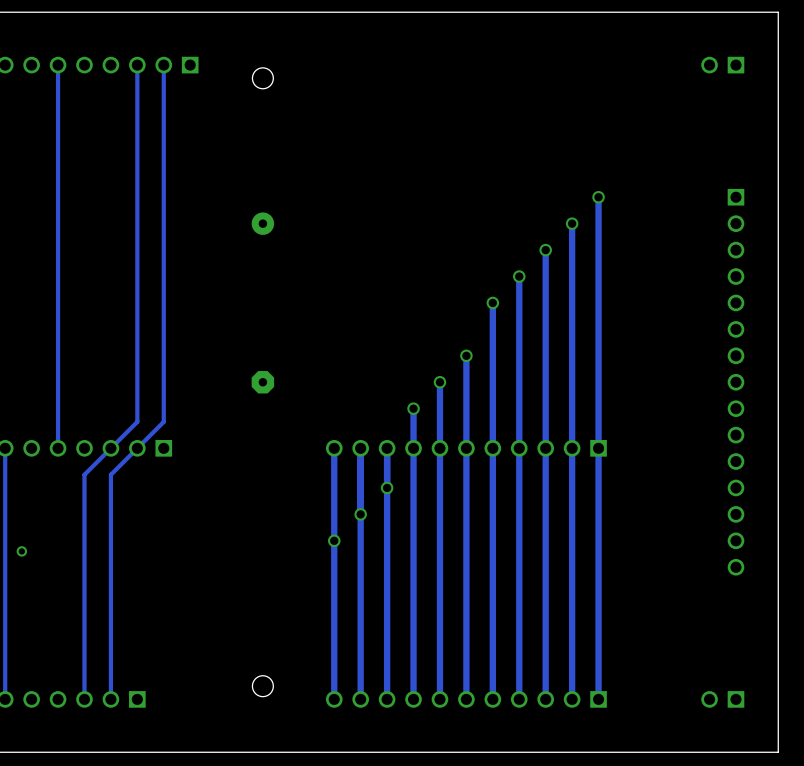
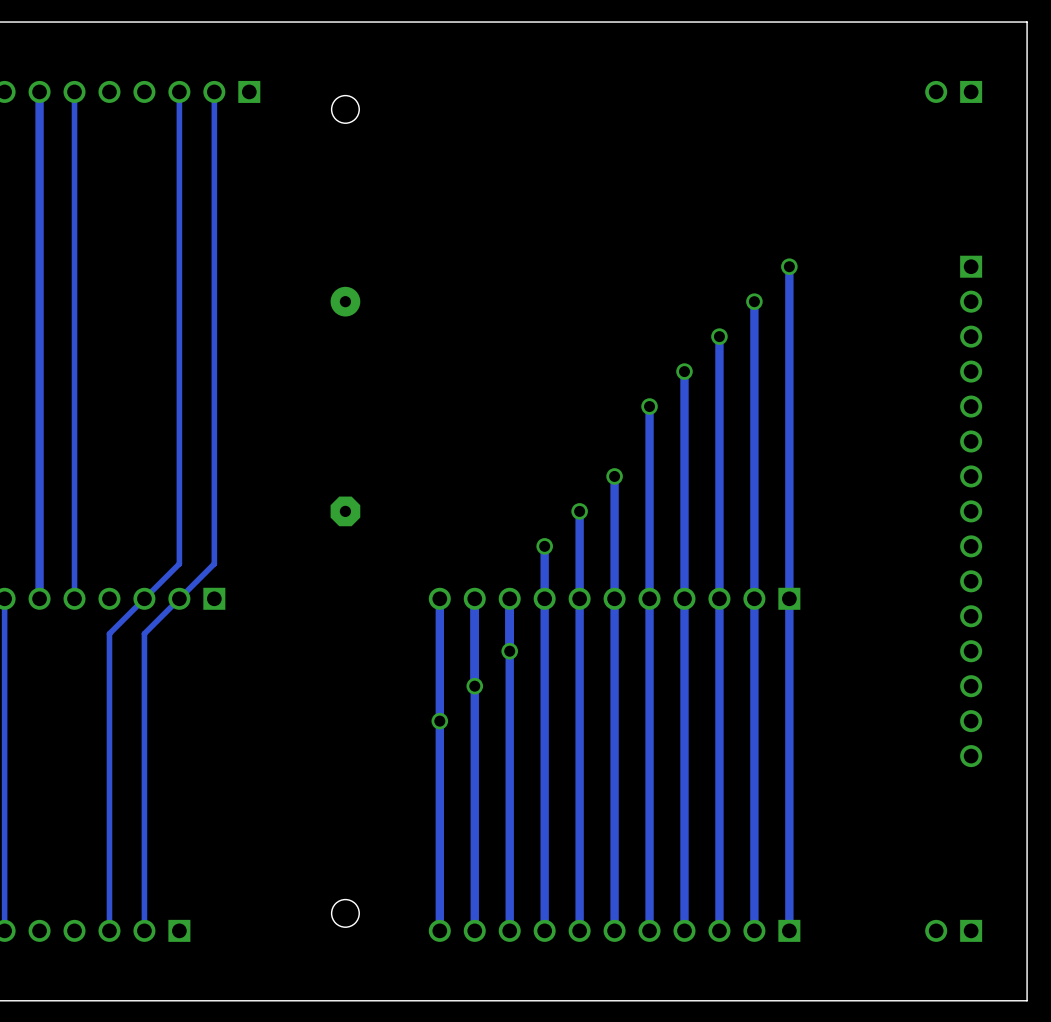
track: none -> (39, 91) (39, 598)
via: (21, 551) -> none

